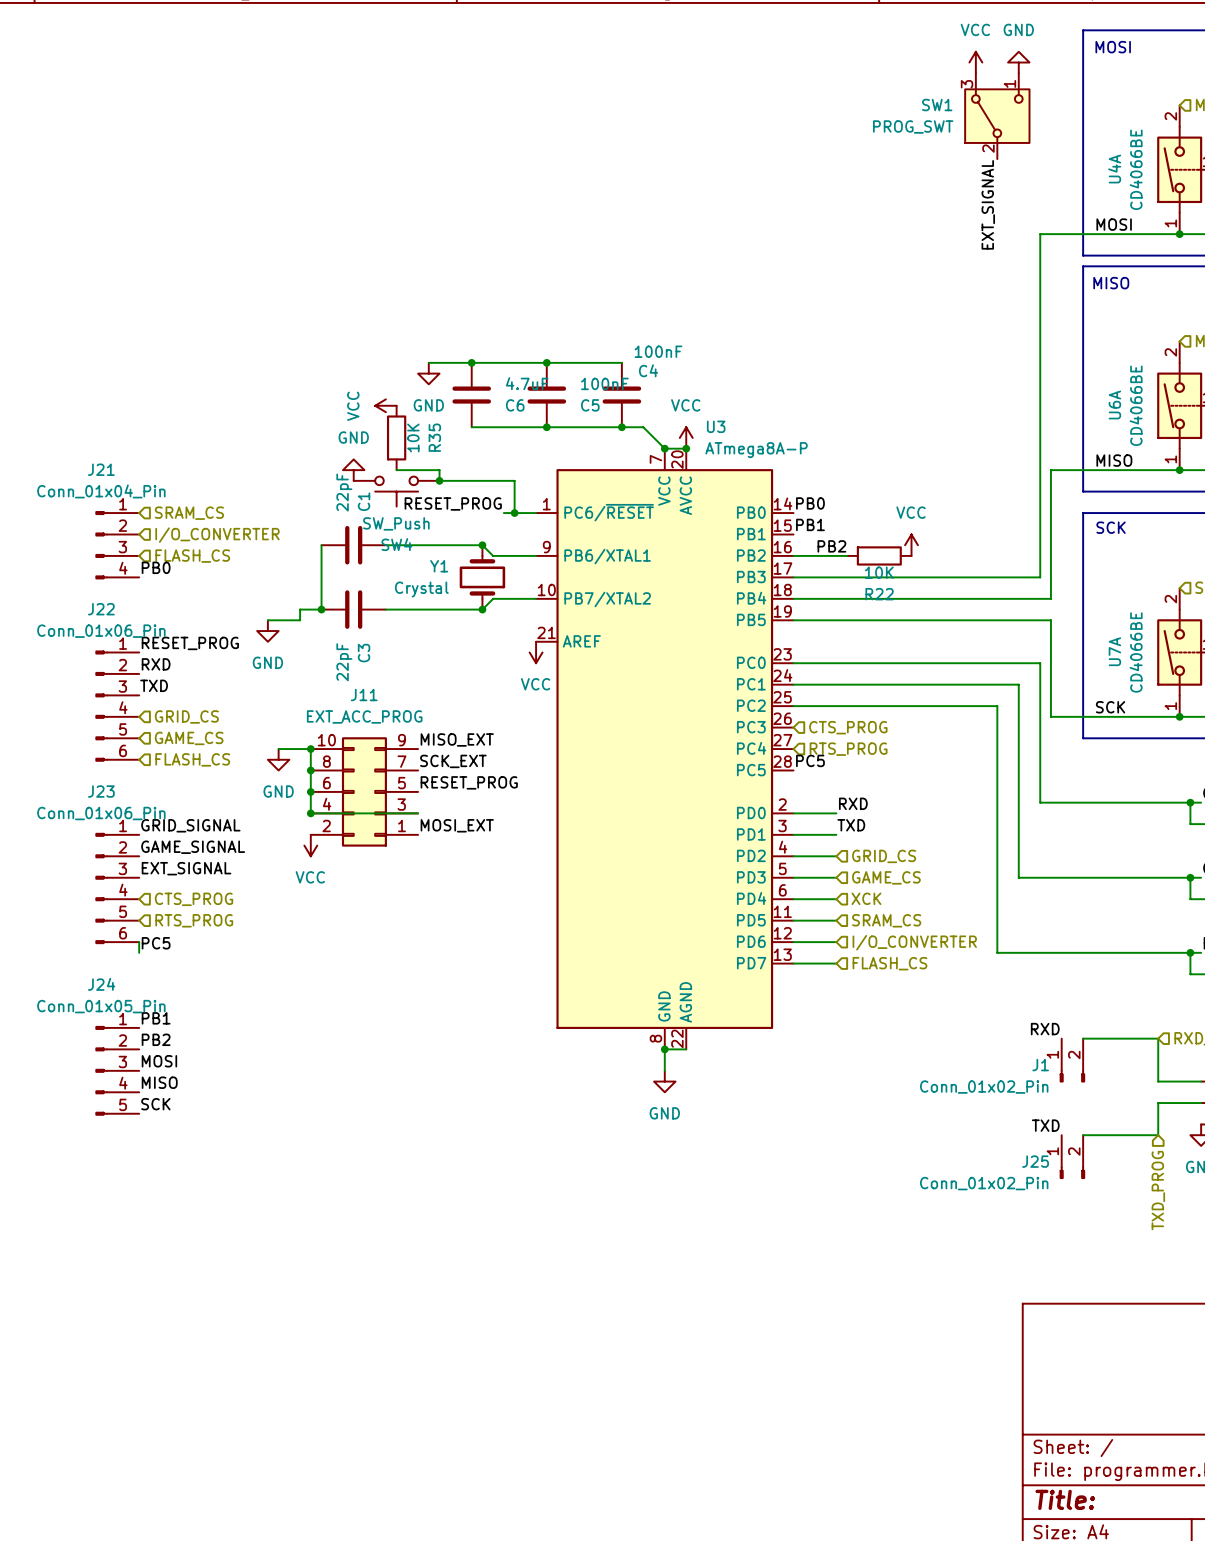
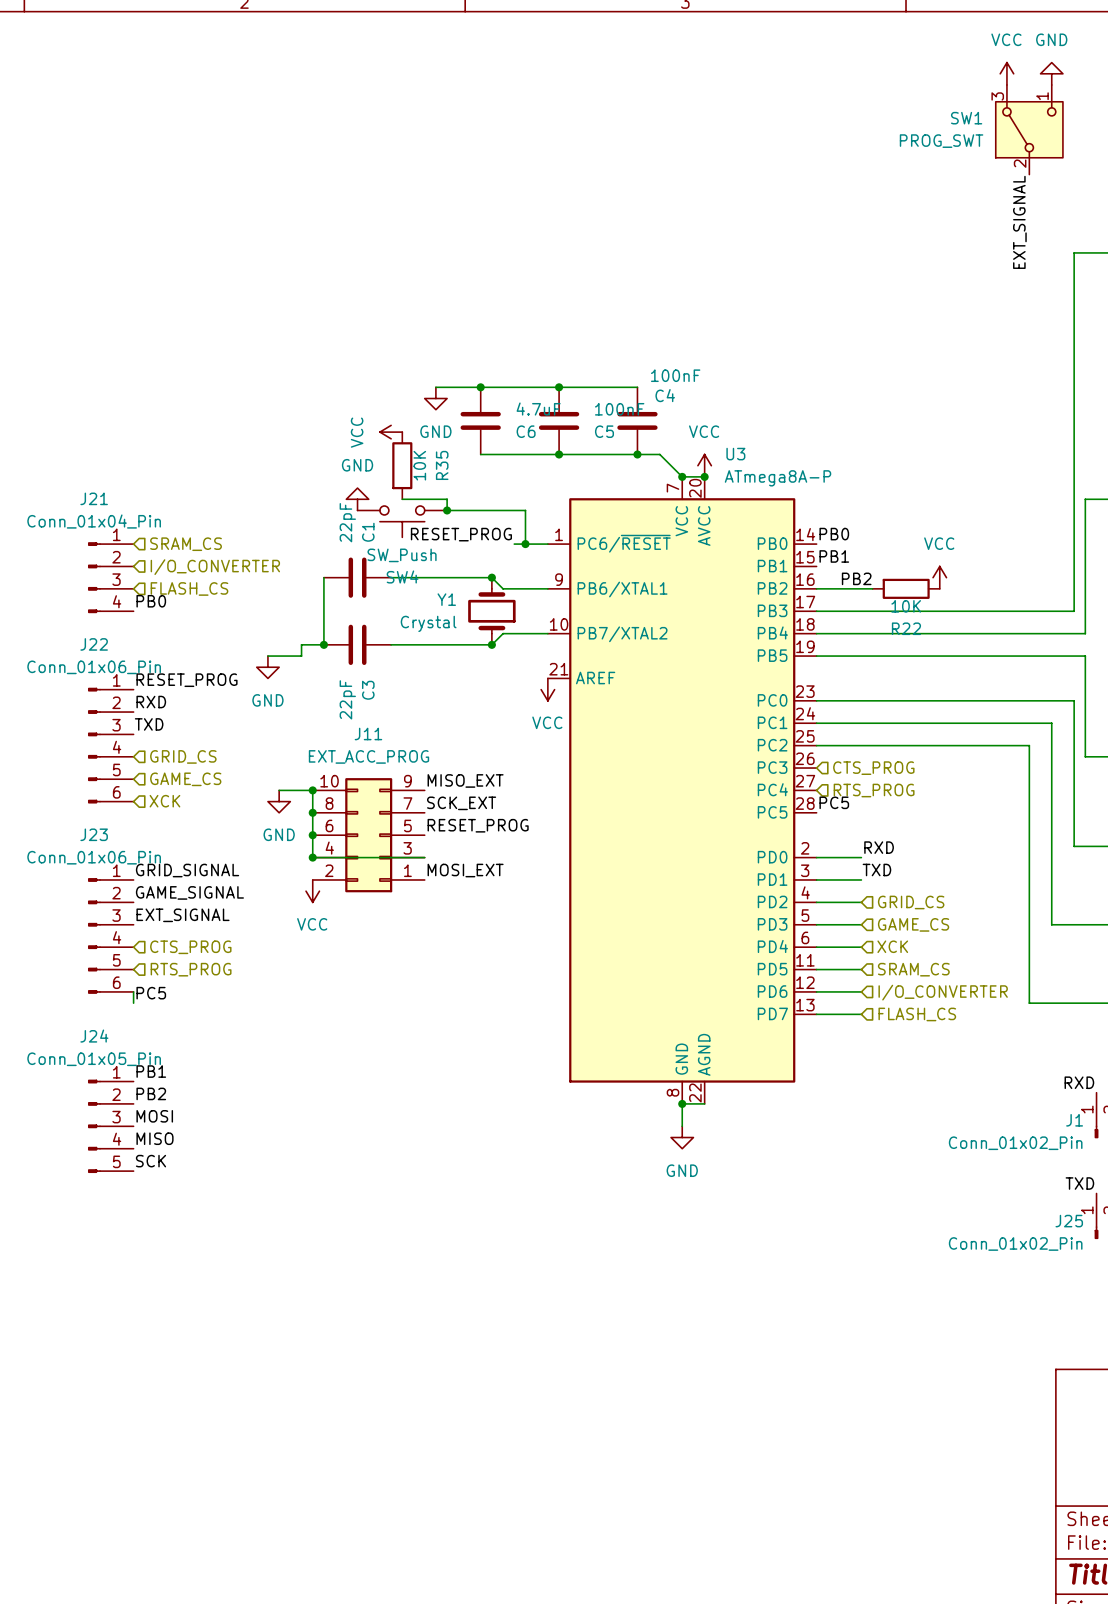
hierarchical label: FLASH_CS (192, 759) -> XCK (164, 801)

